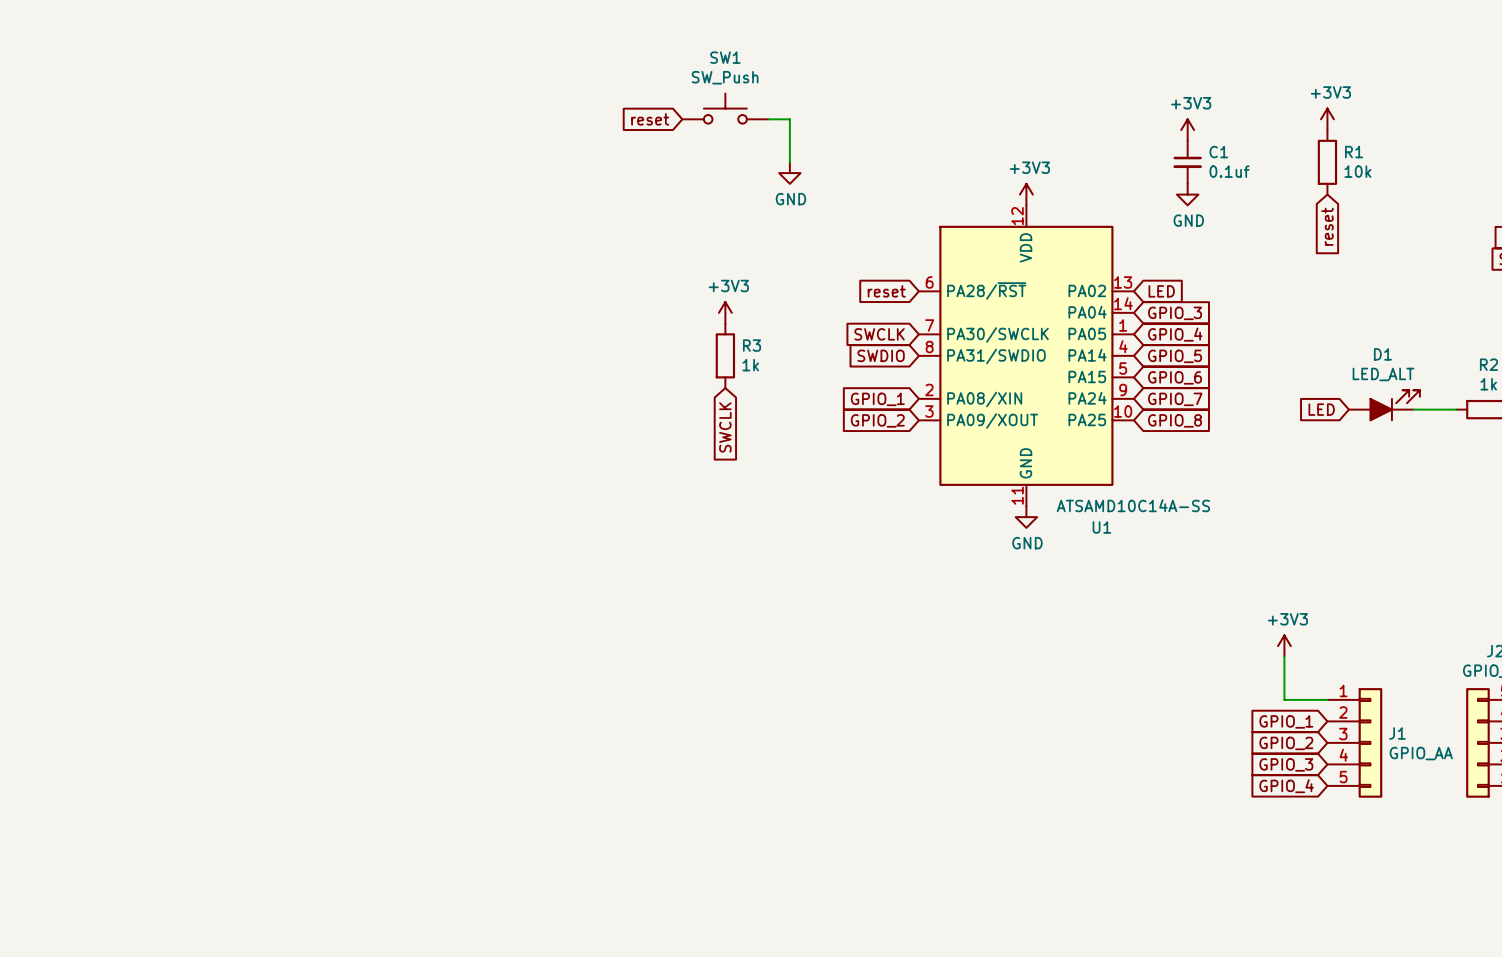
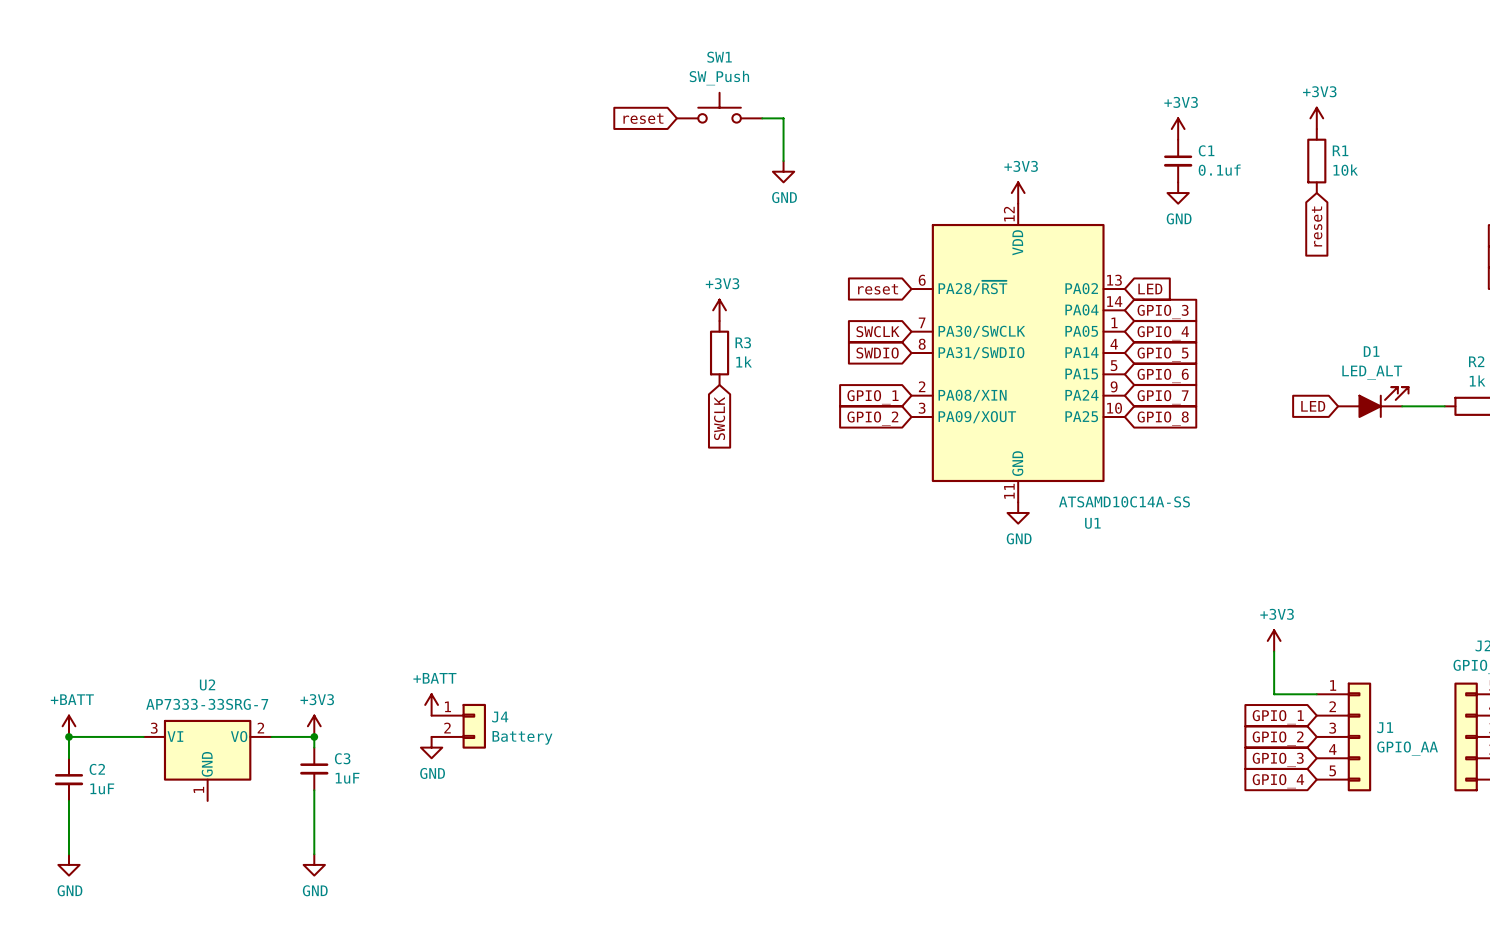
power symbol: none -> +BATT (431, 704)
power symbol: none -> +BATT (68, 726)
power symbol: none -> +3V3 (314, 726)
J4: none -> Battery (458, 726)
junction: none -> (68, 736)
wire: none -> (143, 736) (68, 736) (68, 758)
wire: none -> (271, 736) (314, 736) (314, 747)
junction: none -> (314, 736)
power symbol: none -> GND (431, 747)
U2: none -> AP7333-33SRG-7 (207, 760)
C3: none -> 1uF (314, 768)
C2: none -> 1uF (68, 779)
wire: none -> (314, 790) (314, 854)
wire: none -> (68, 800) (68, 854)
power symbol: none -> GND (68, 864)
power symbol: none -> GND (314, 864)

